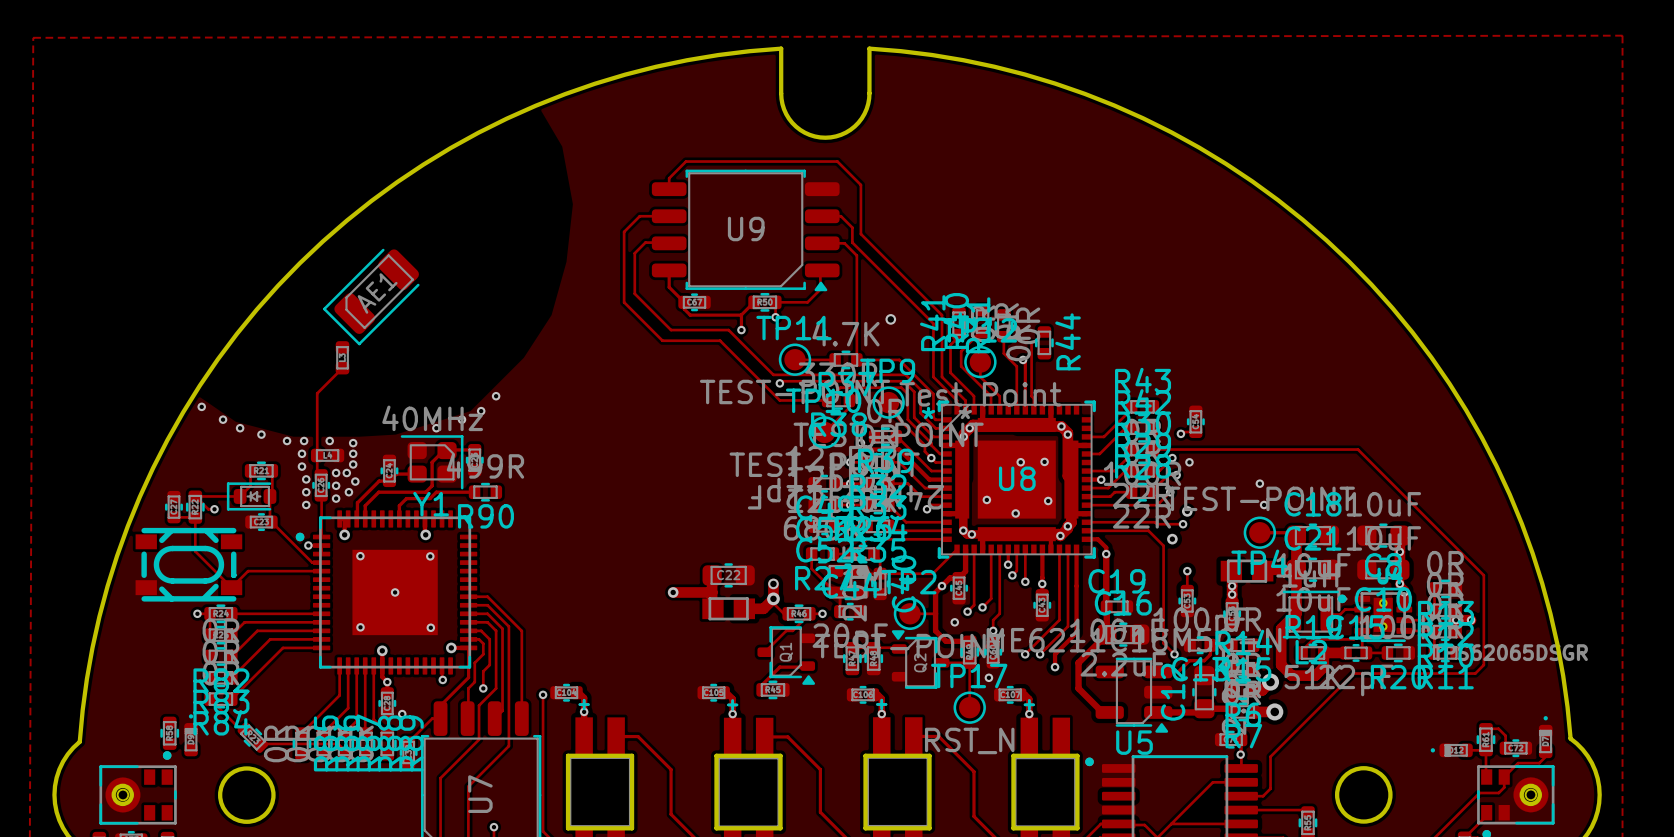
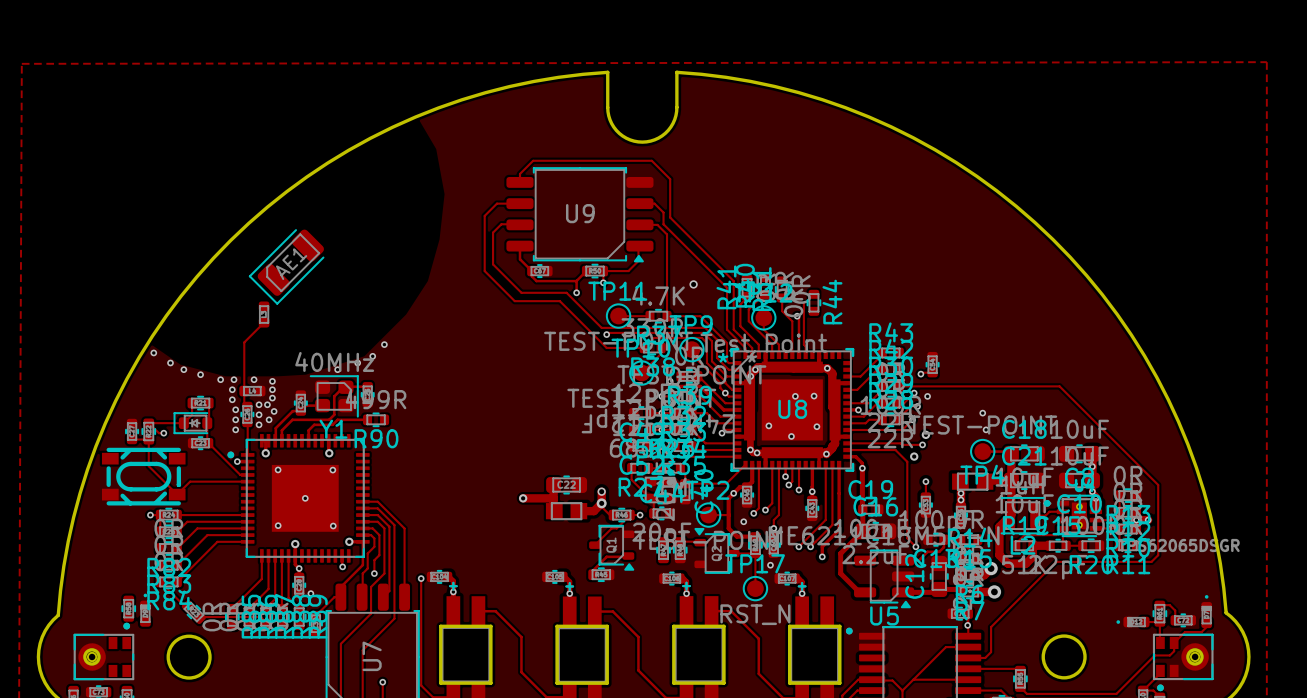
via: (1067, 434) -> none
via: (1067, 526) -> none

